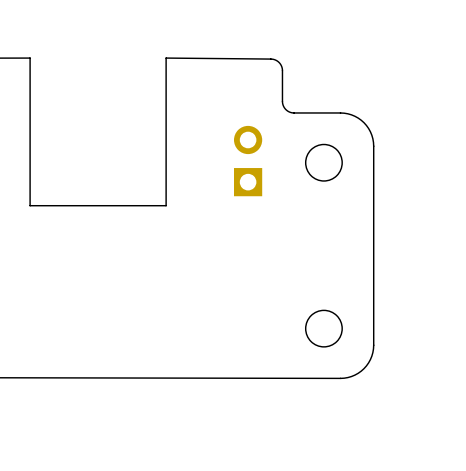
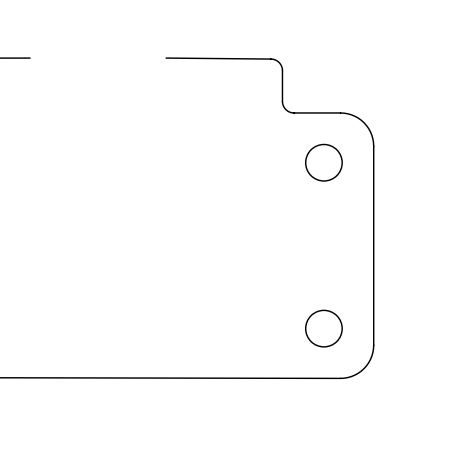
part: (98, 131) -> none
part: (248, 161) -> none

